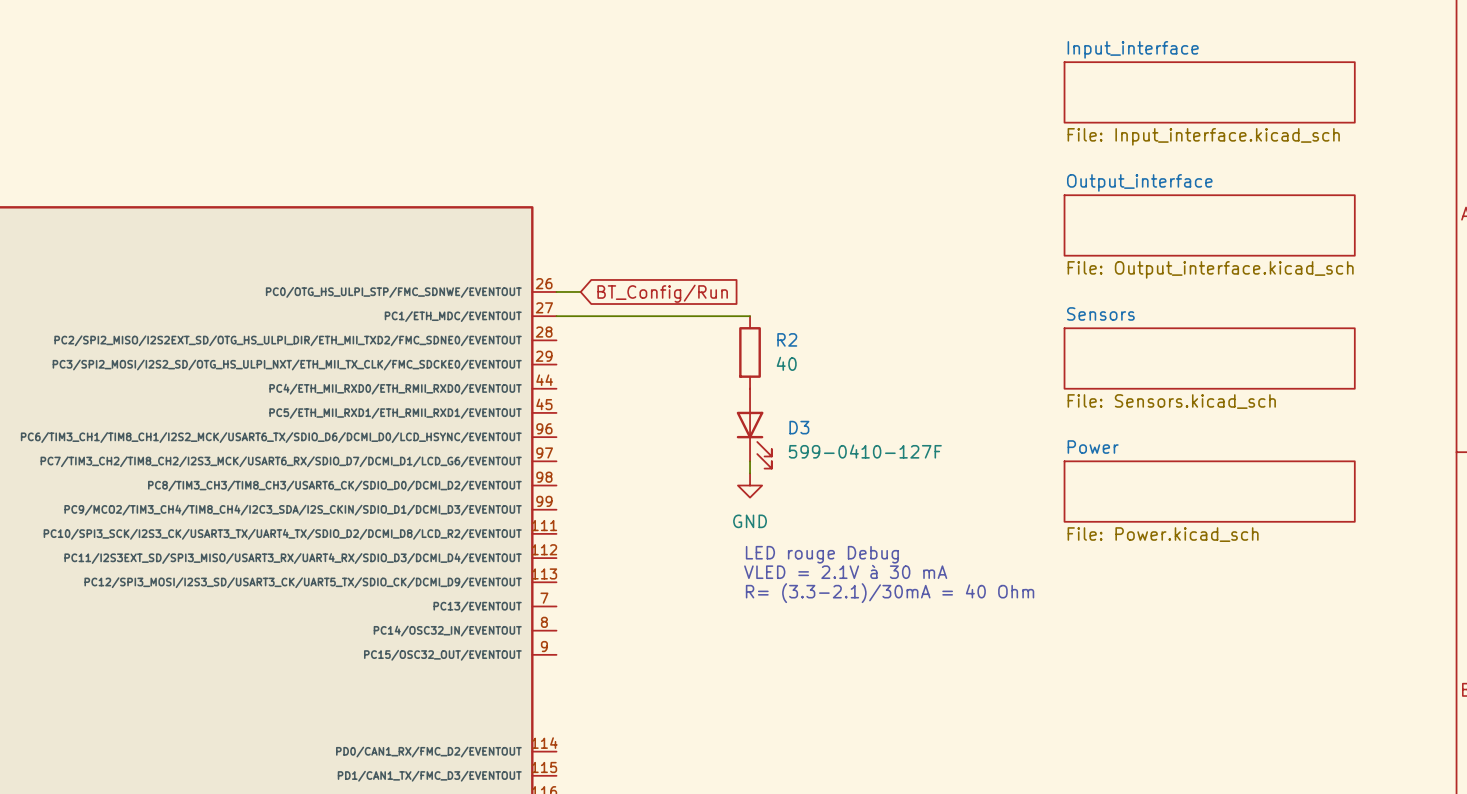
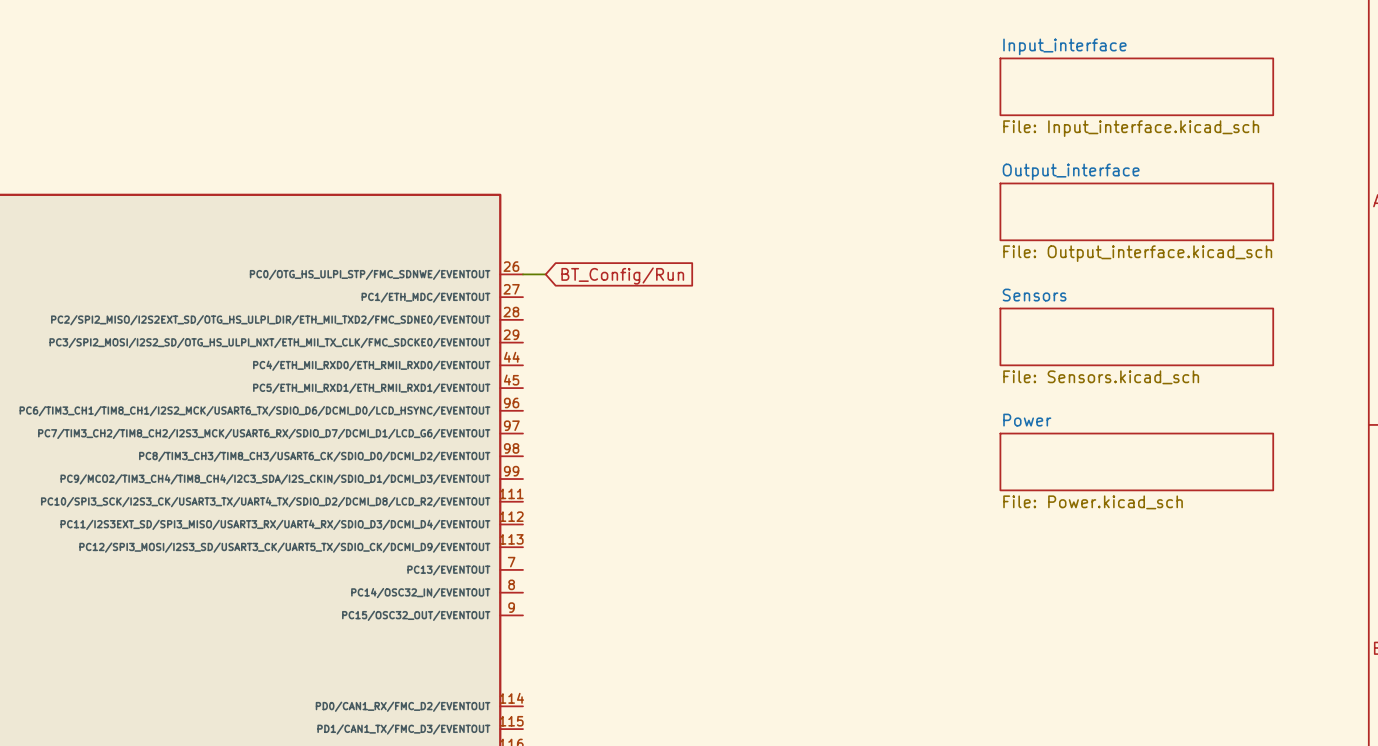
wire: (556, 316) (750, 316) -> none
R2: 40 (750, 352) -> none
D3: 599-0410-127F (754, 428) -> none
wire: (750, 461) (750, 473) -> none
power symbol: GND (750, 485) -> none
text: LED rouge Debug (822, 554) -> none
text: VLED = 2.1V à 30 mA (845, 571) -> none
text: R= (3.3-2.1)/30mA = 40 Ohm (890, 593) -> none

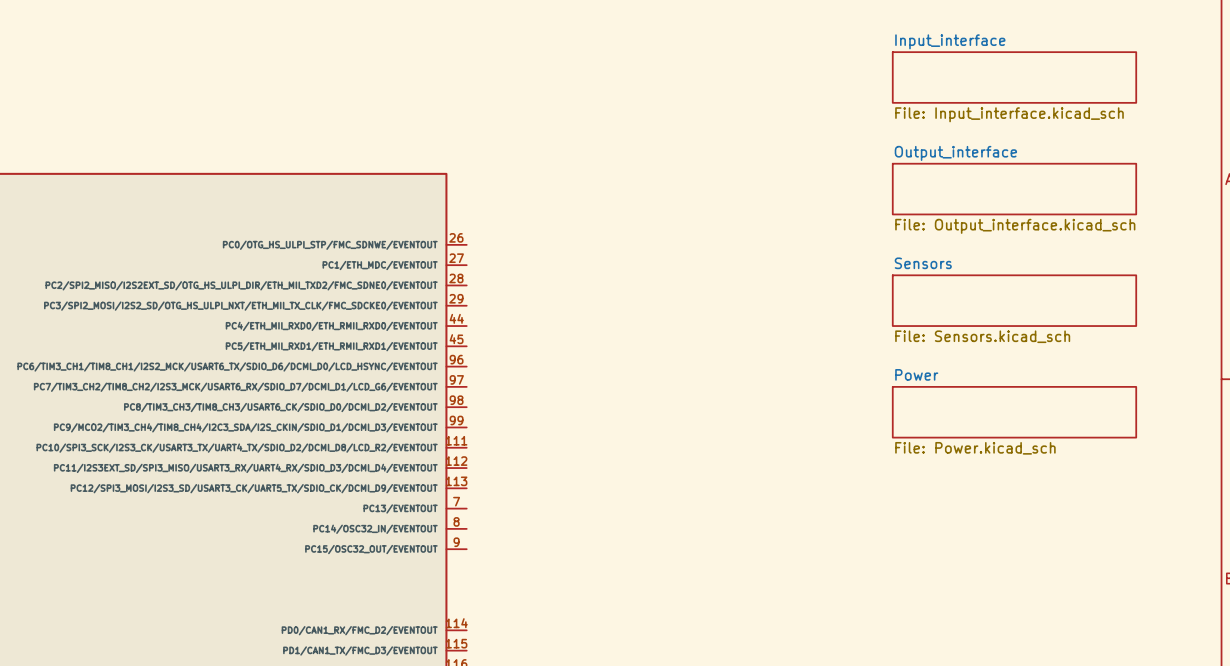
wire: (522, 274) (545, 274) -> none
global label: BT_Config/Run (622, 276) -> none

